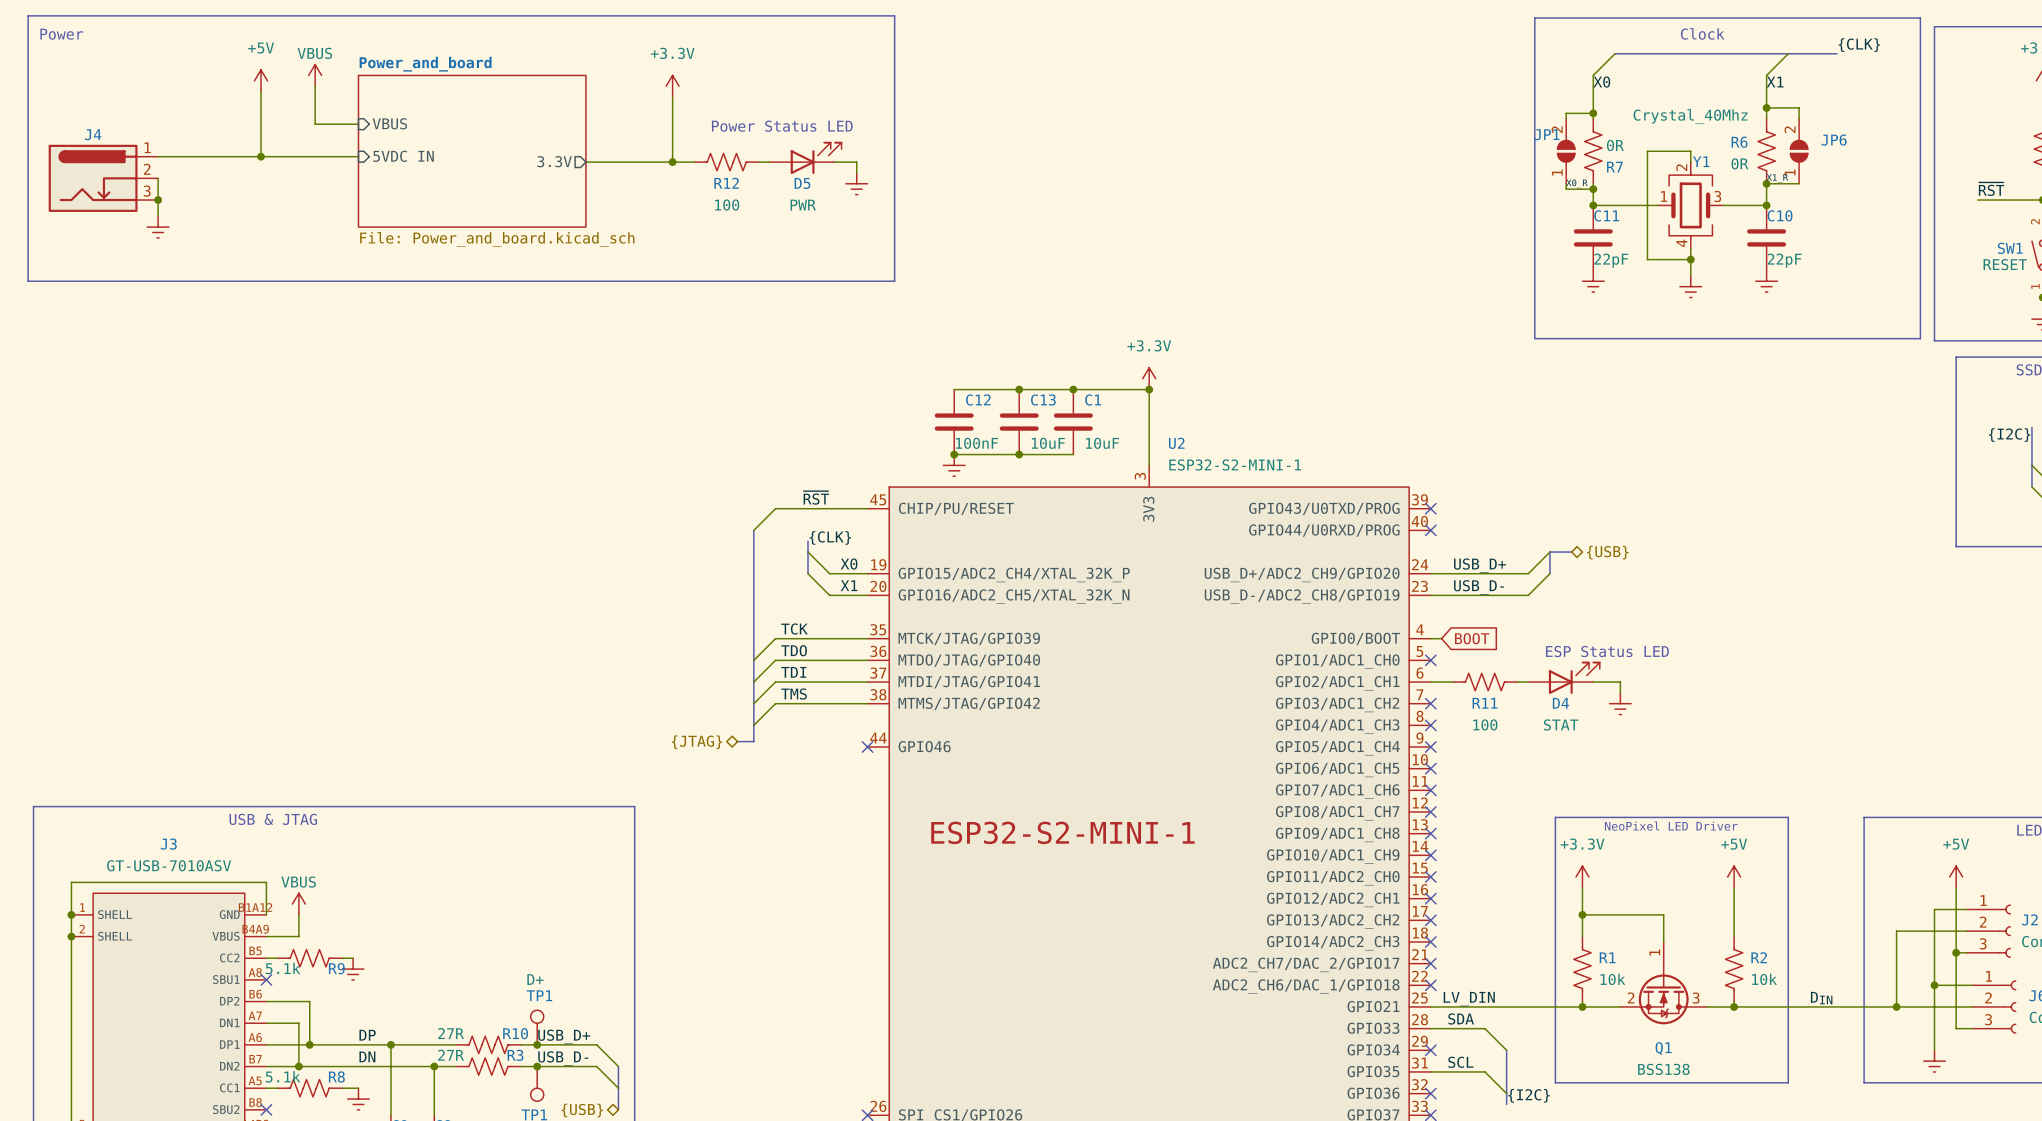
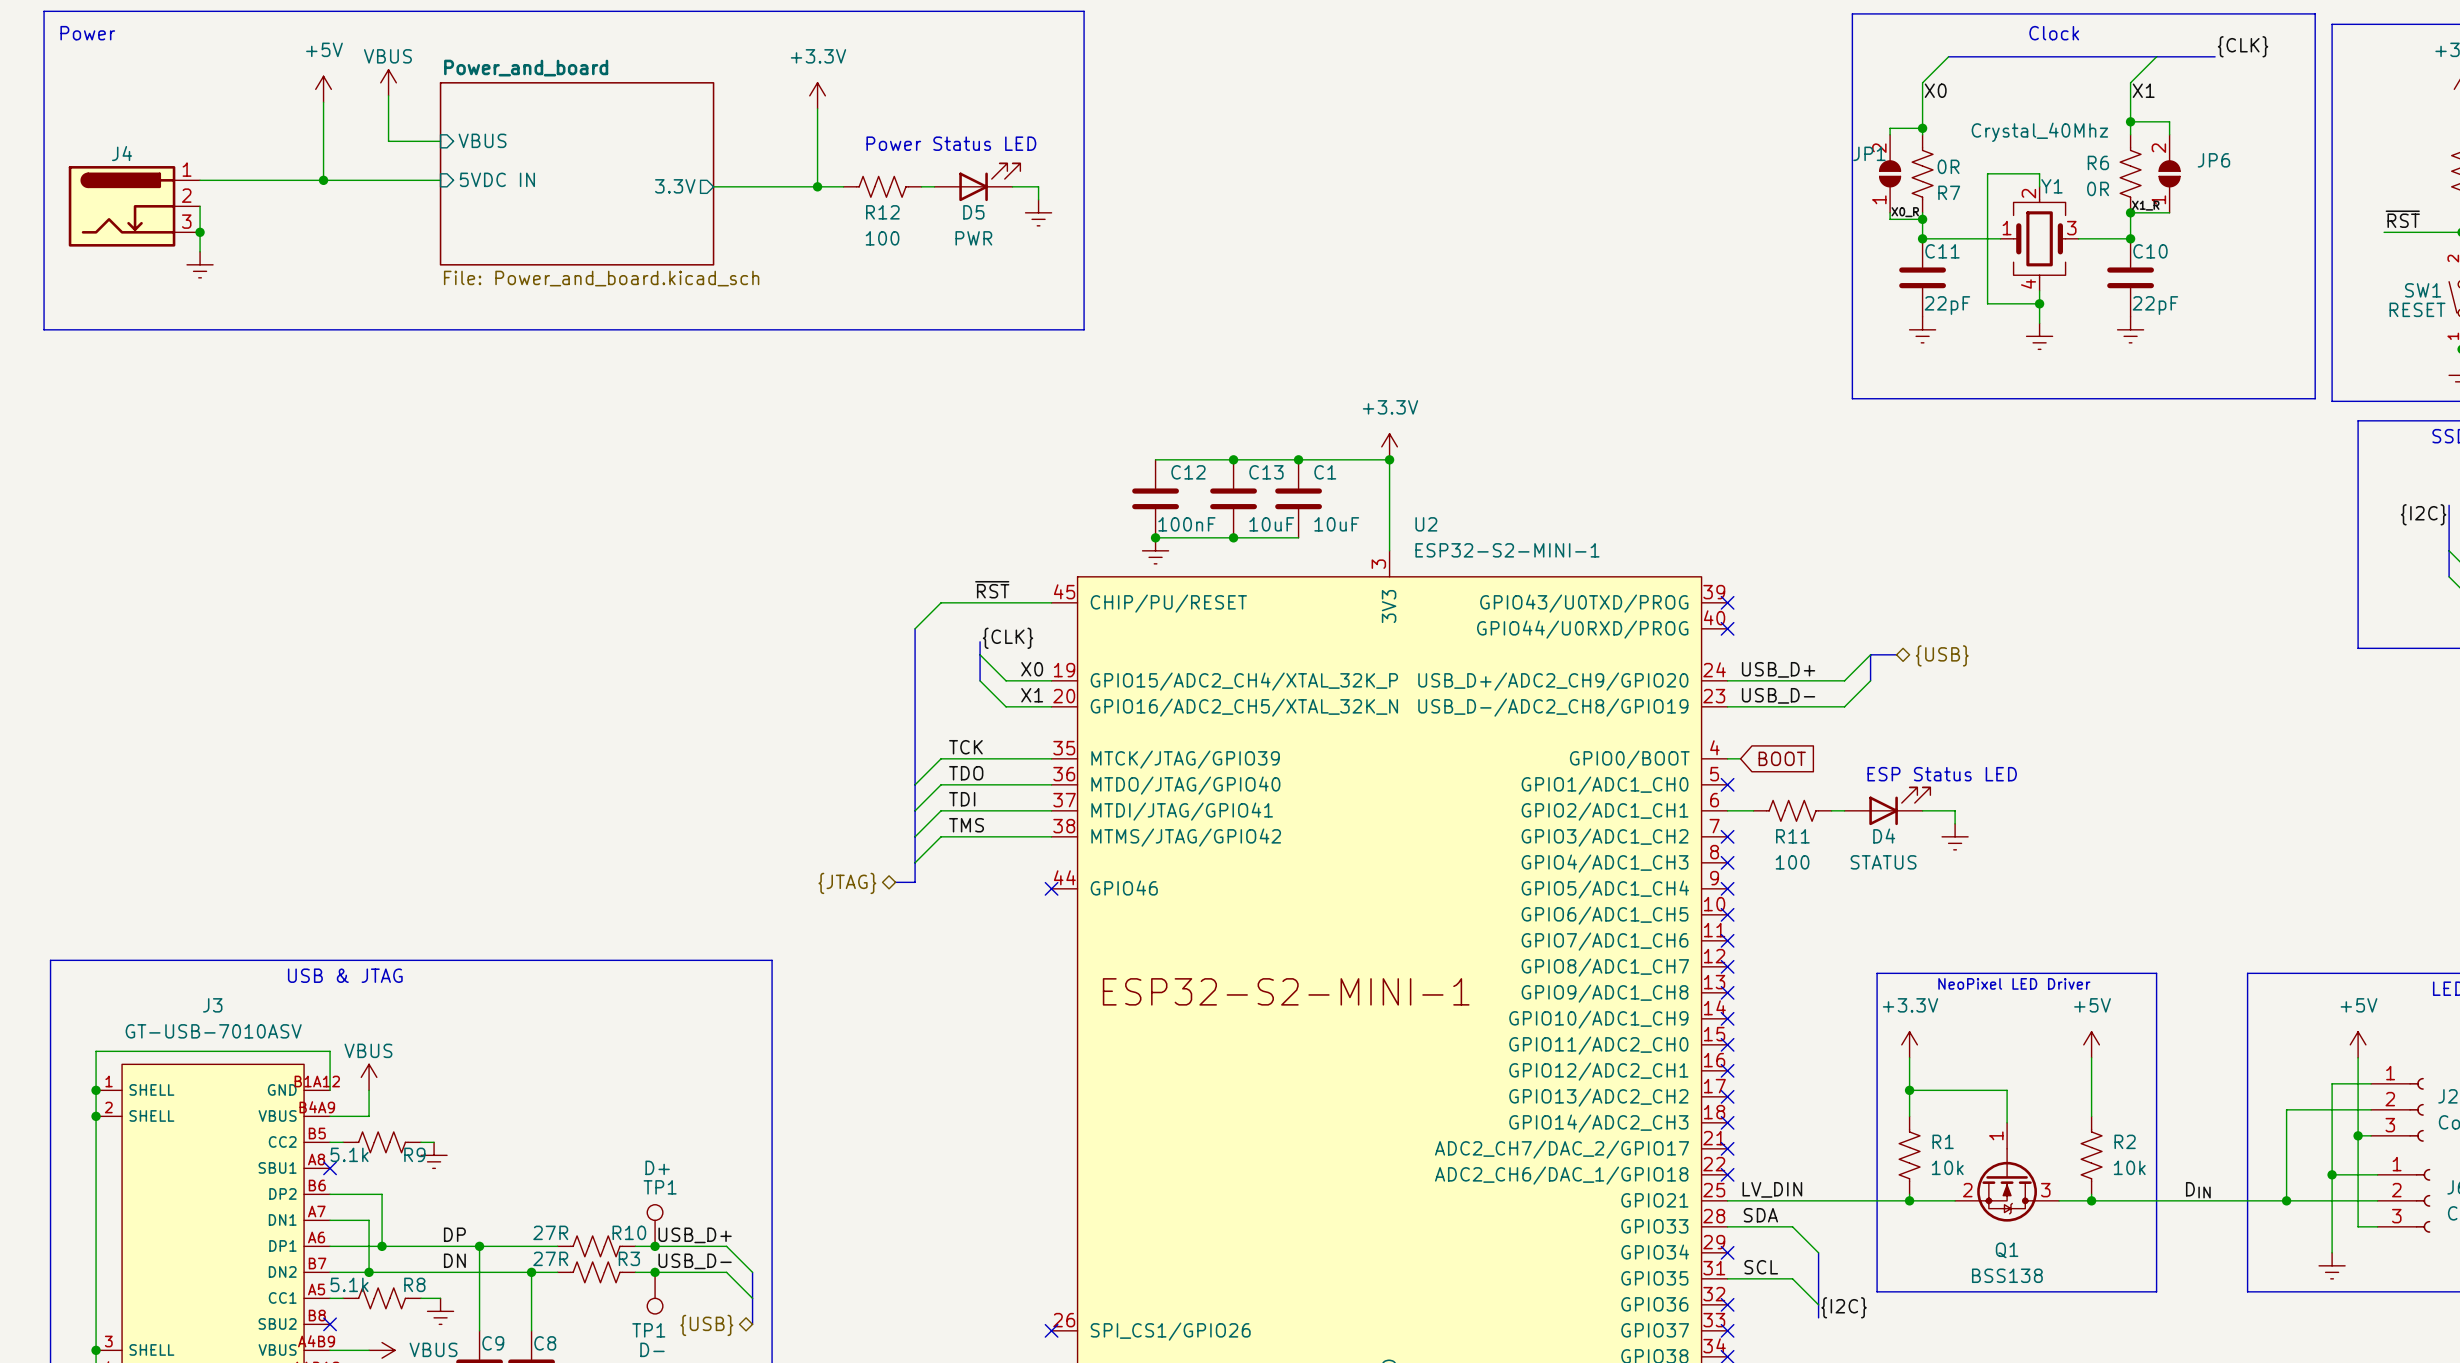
D4 value: STAT (1561, 724) -> STATUS (1883, 862)

